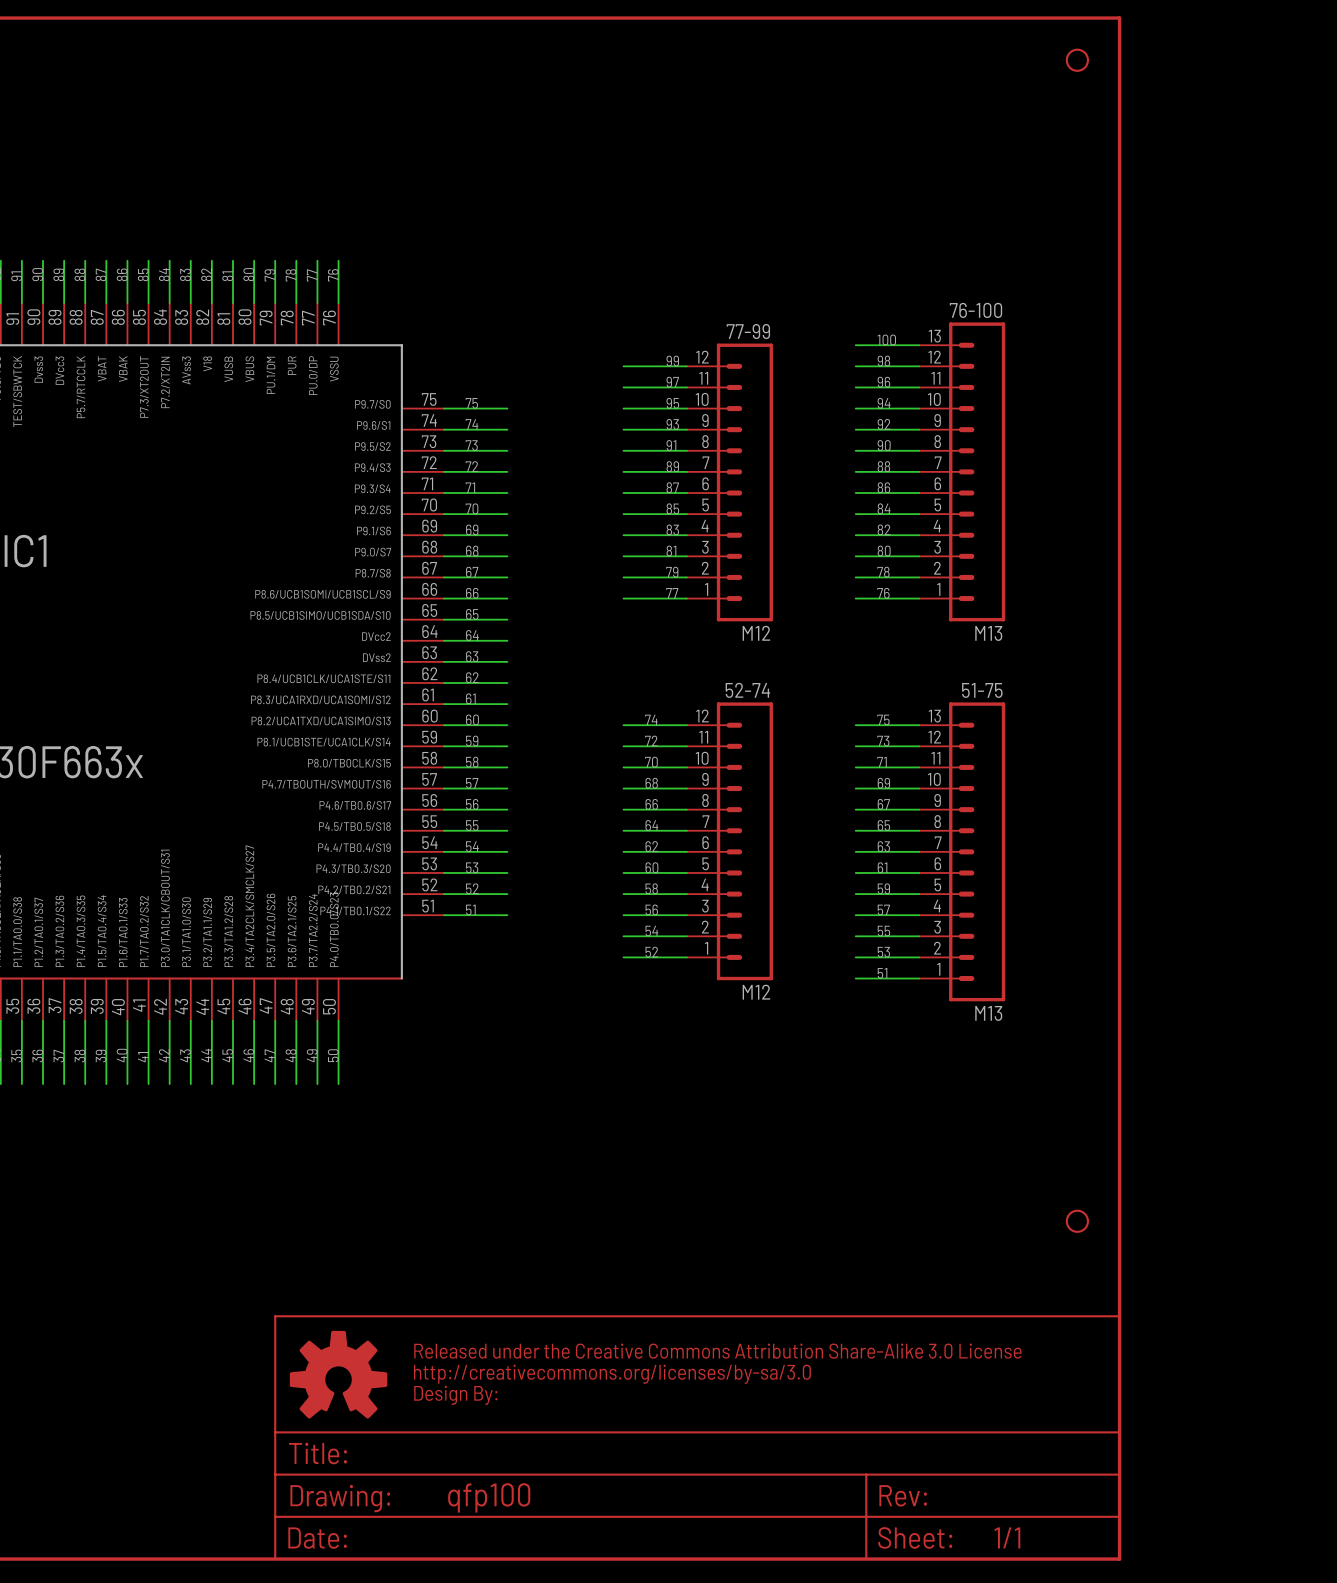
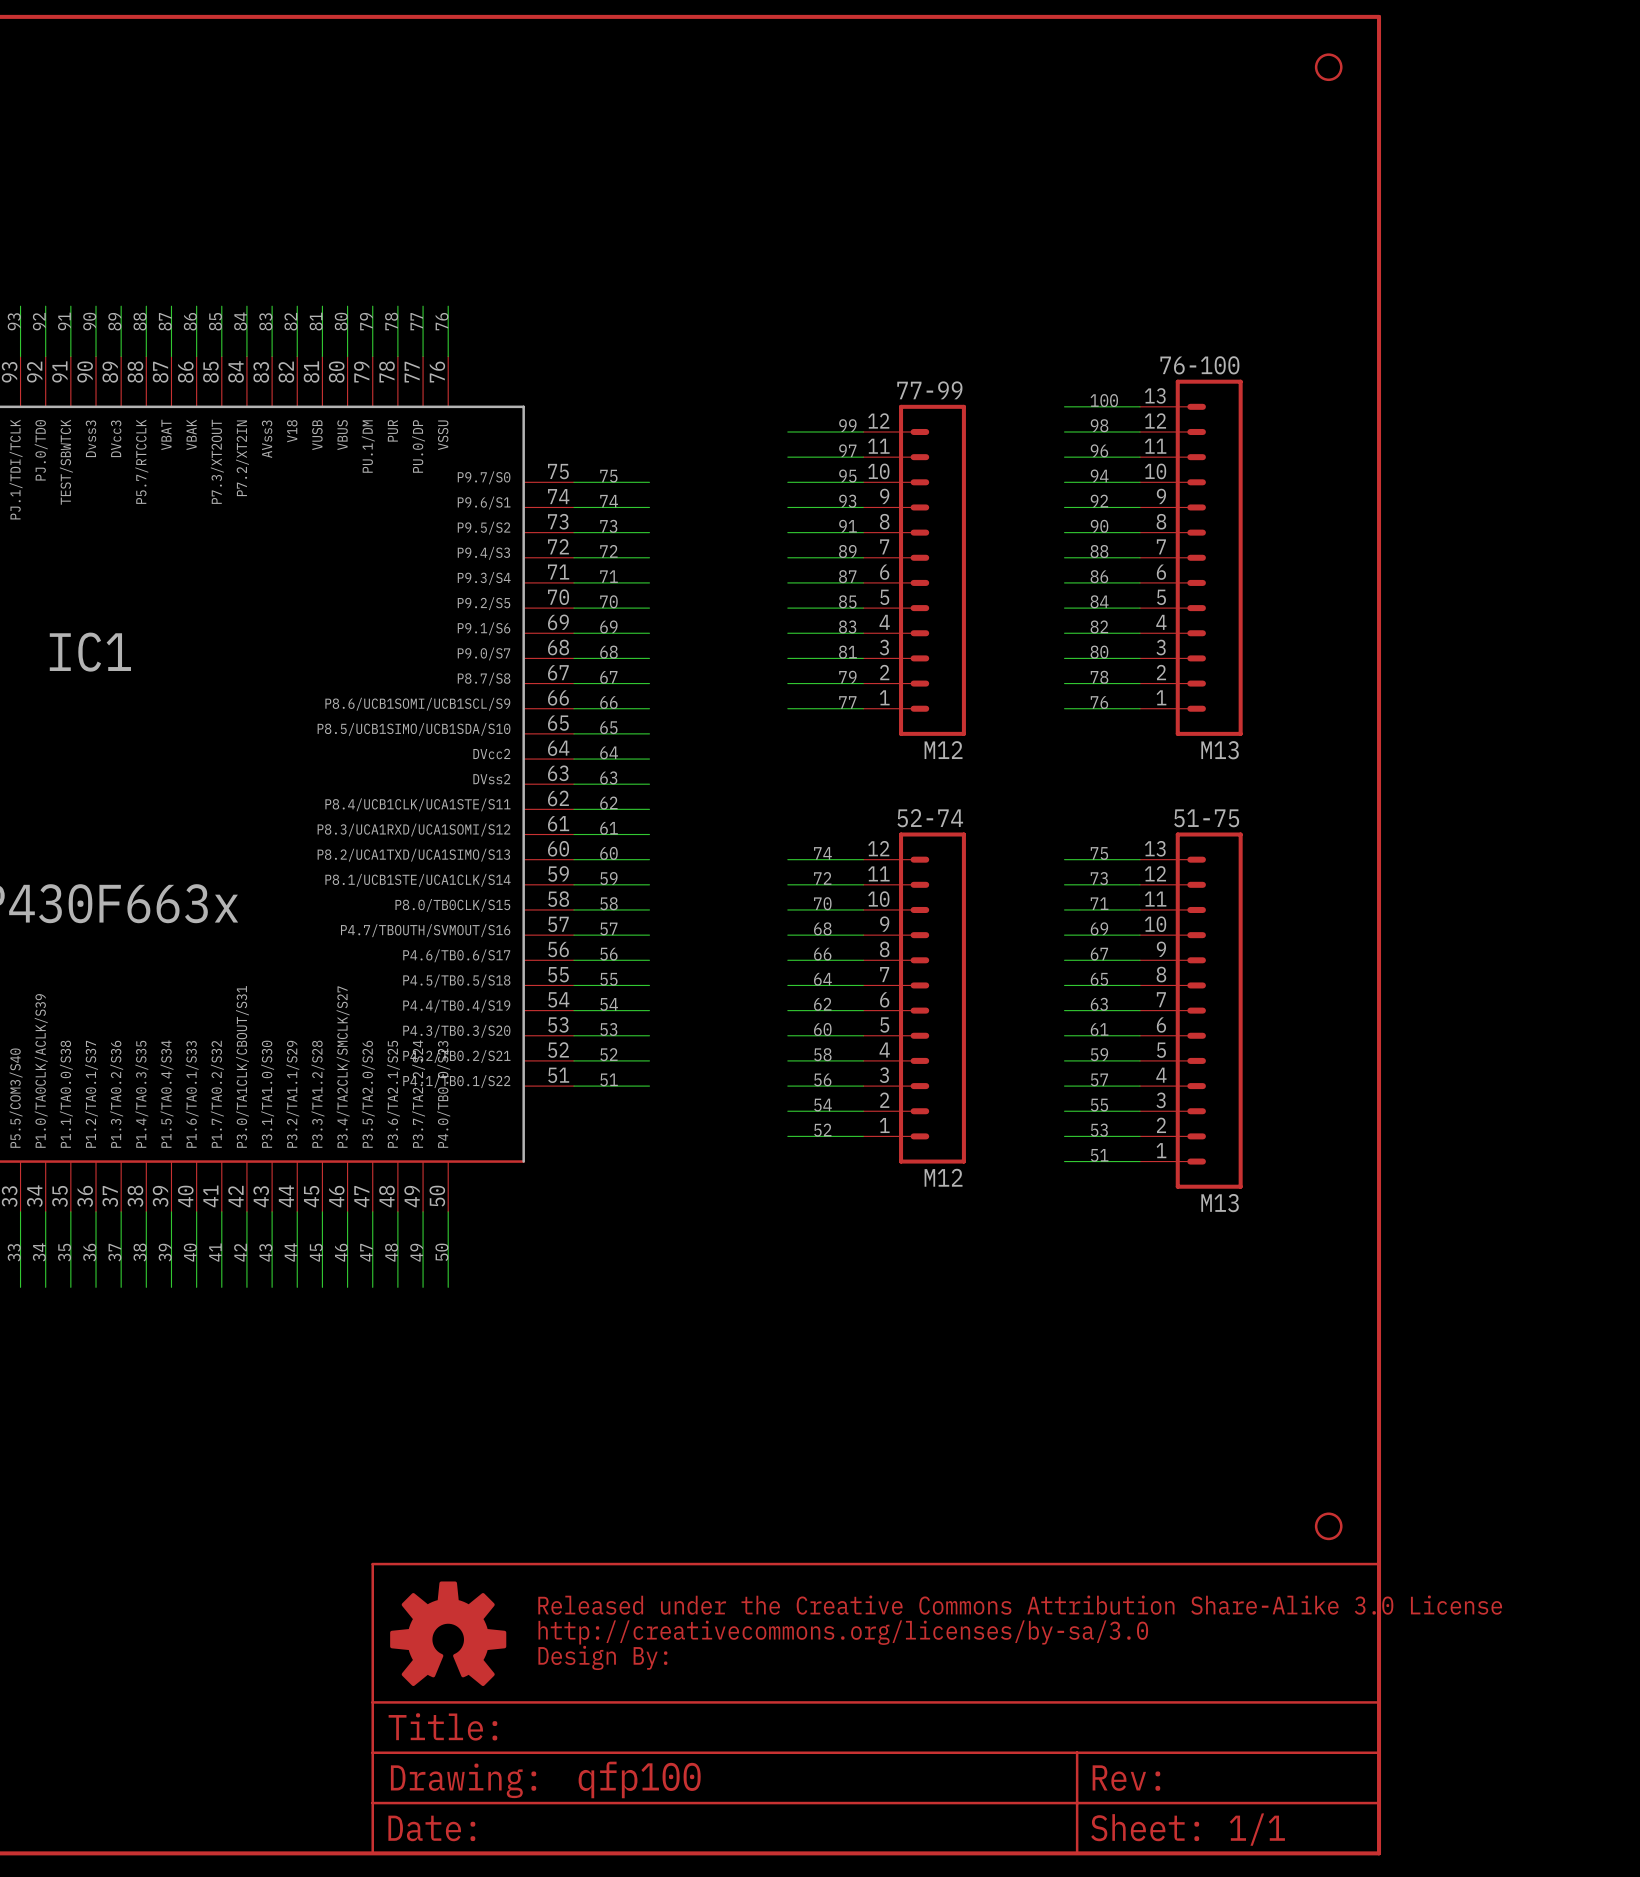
part position: (1077, 1221) -> (1328, 1526)

